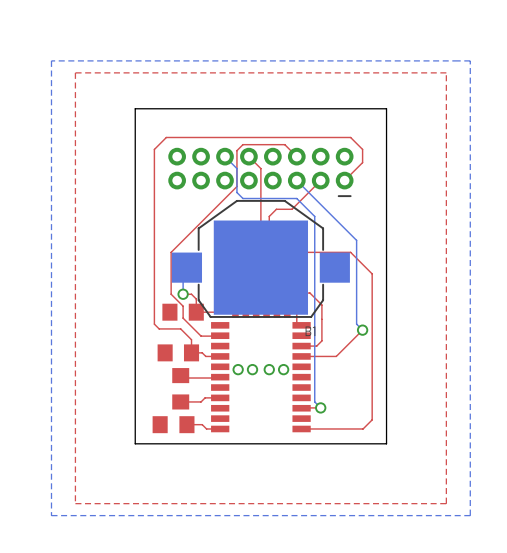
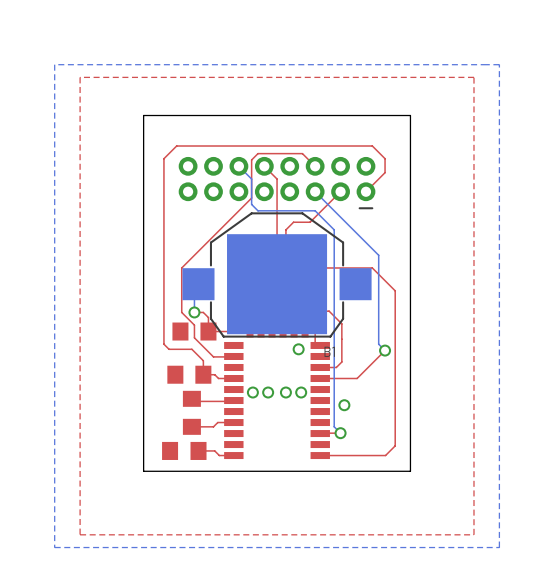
via: none -> (298, 349)
via: none -> (344, 405)

